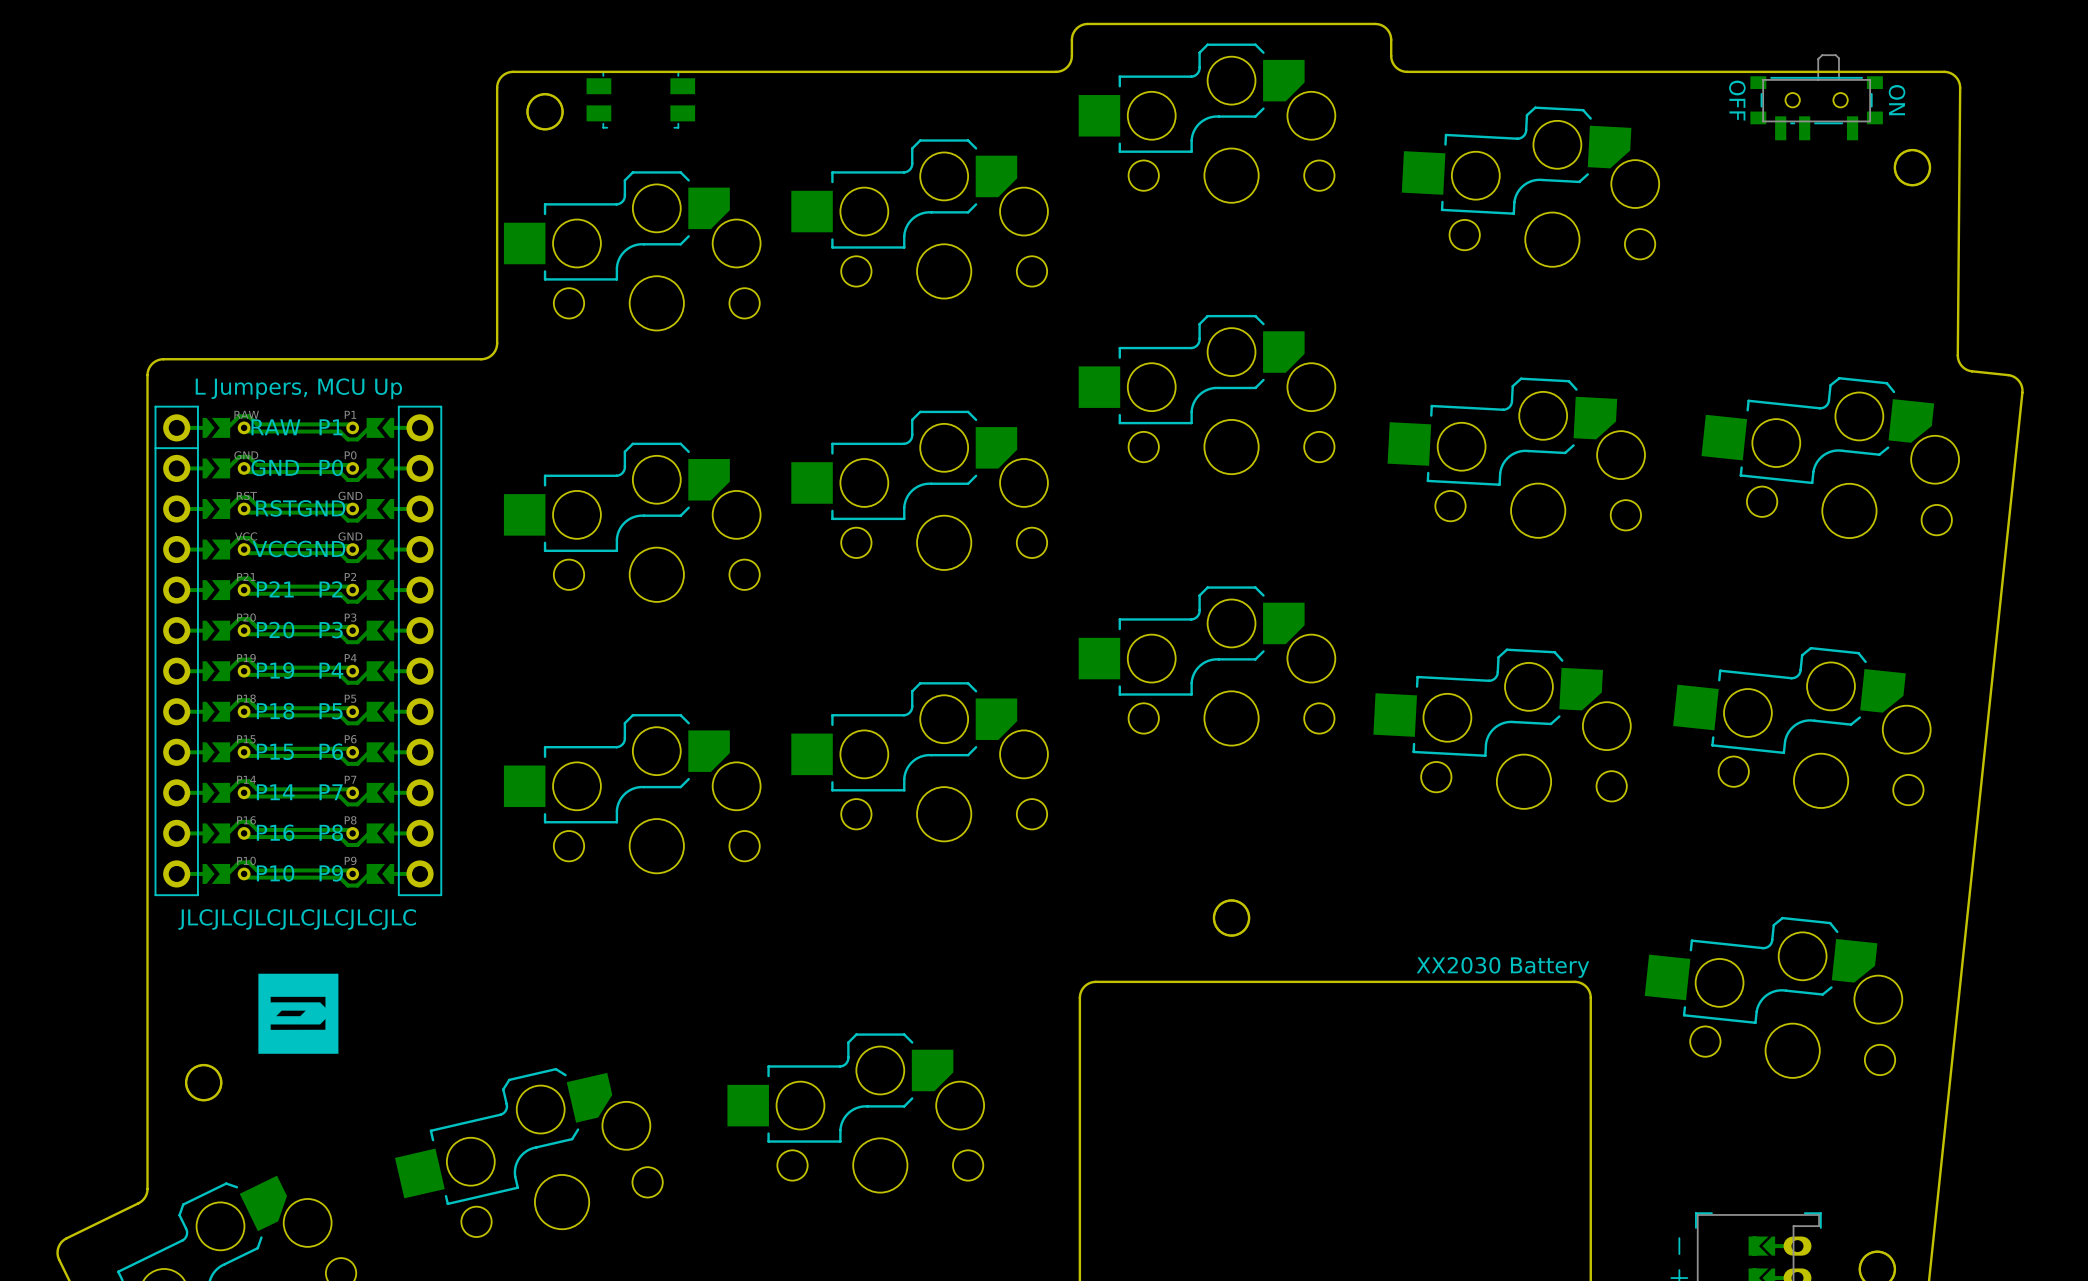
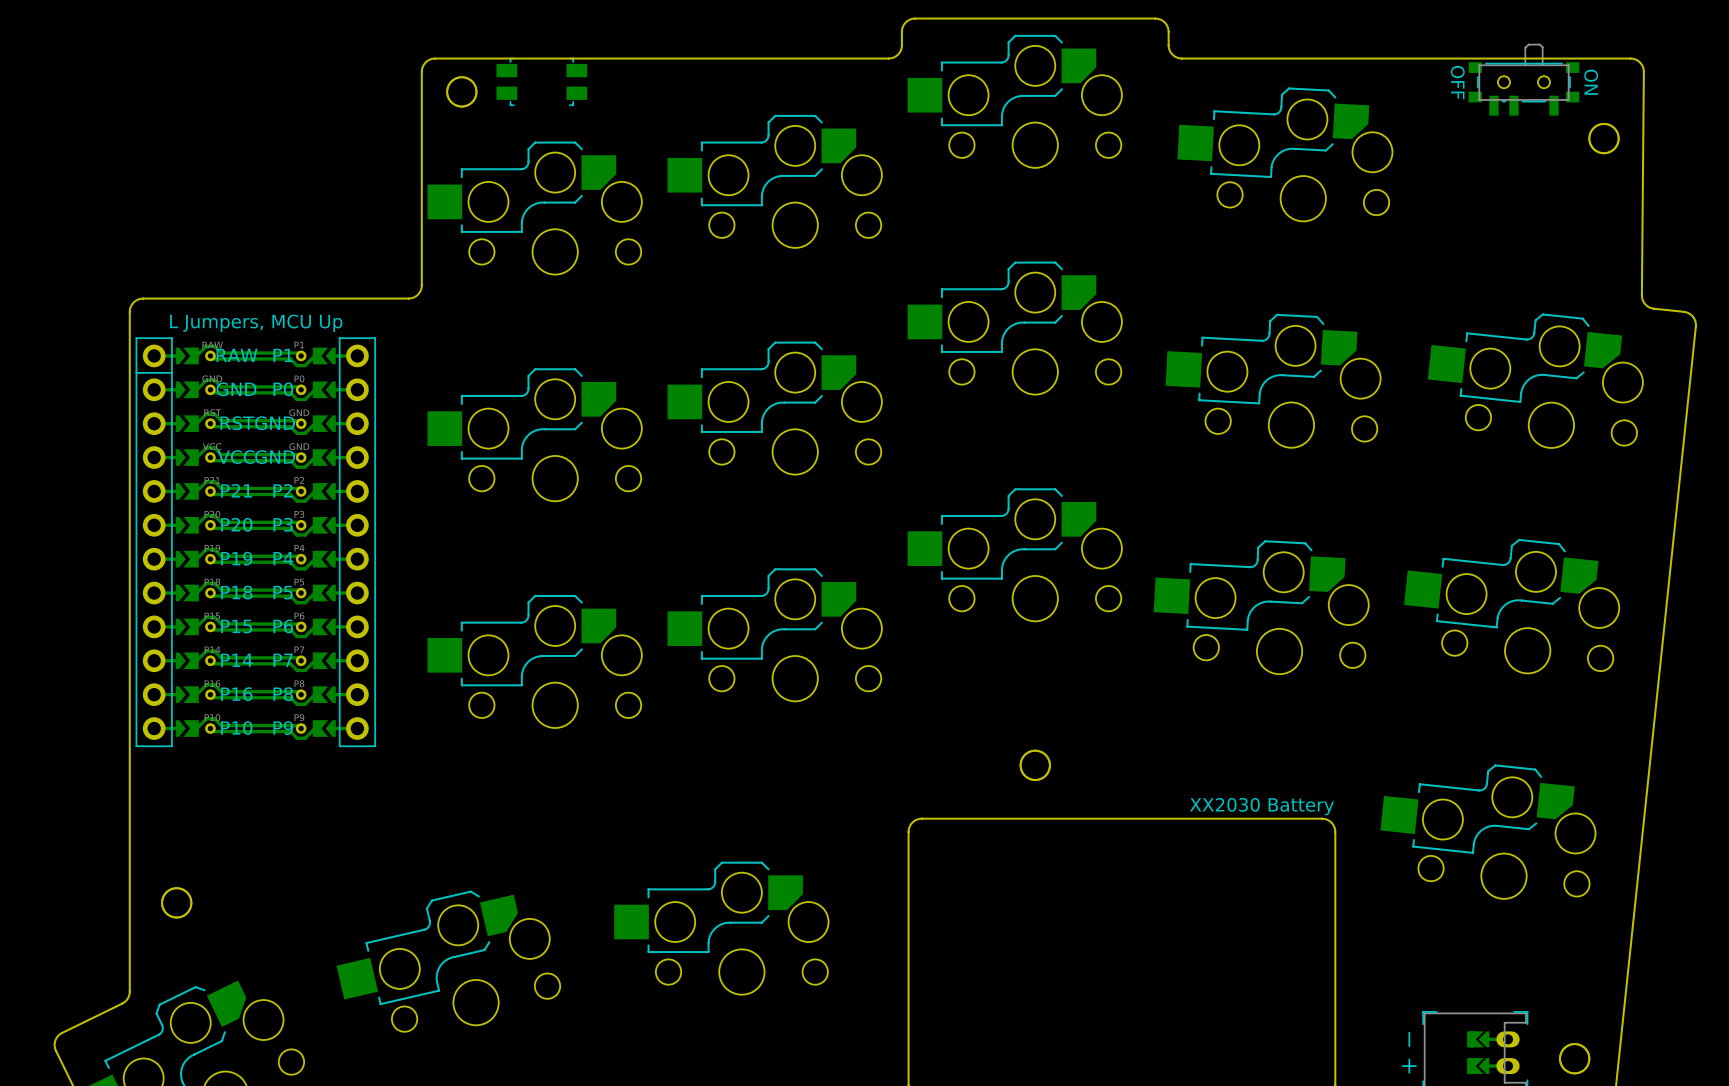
text: JLCJLCJLCJLCJLCJLCJLC (297, 919) -> none
drawing: [258, 973, 339, 1054] -> none

